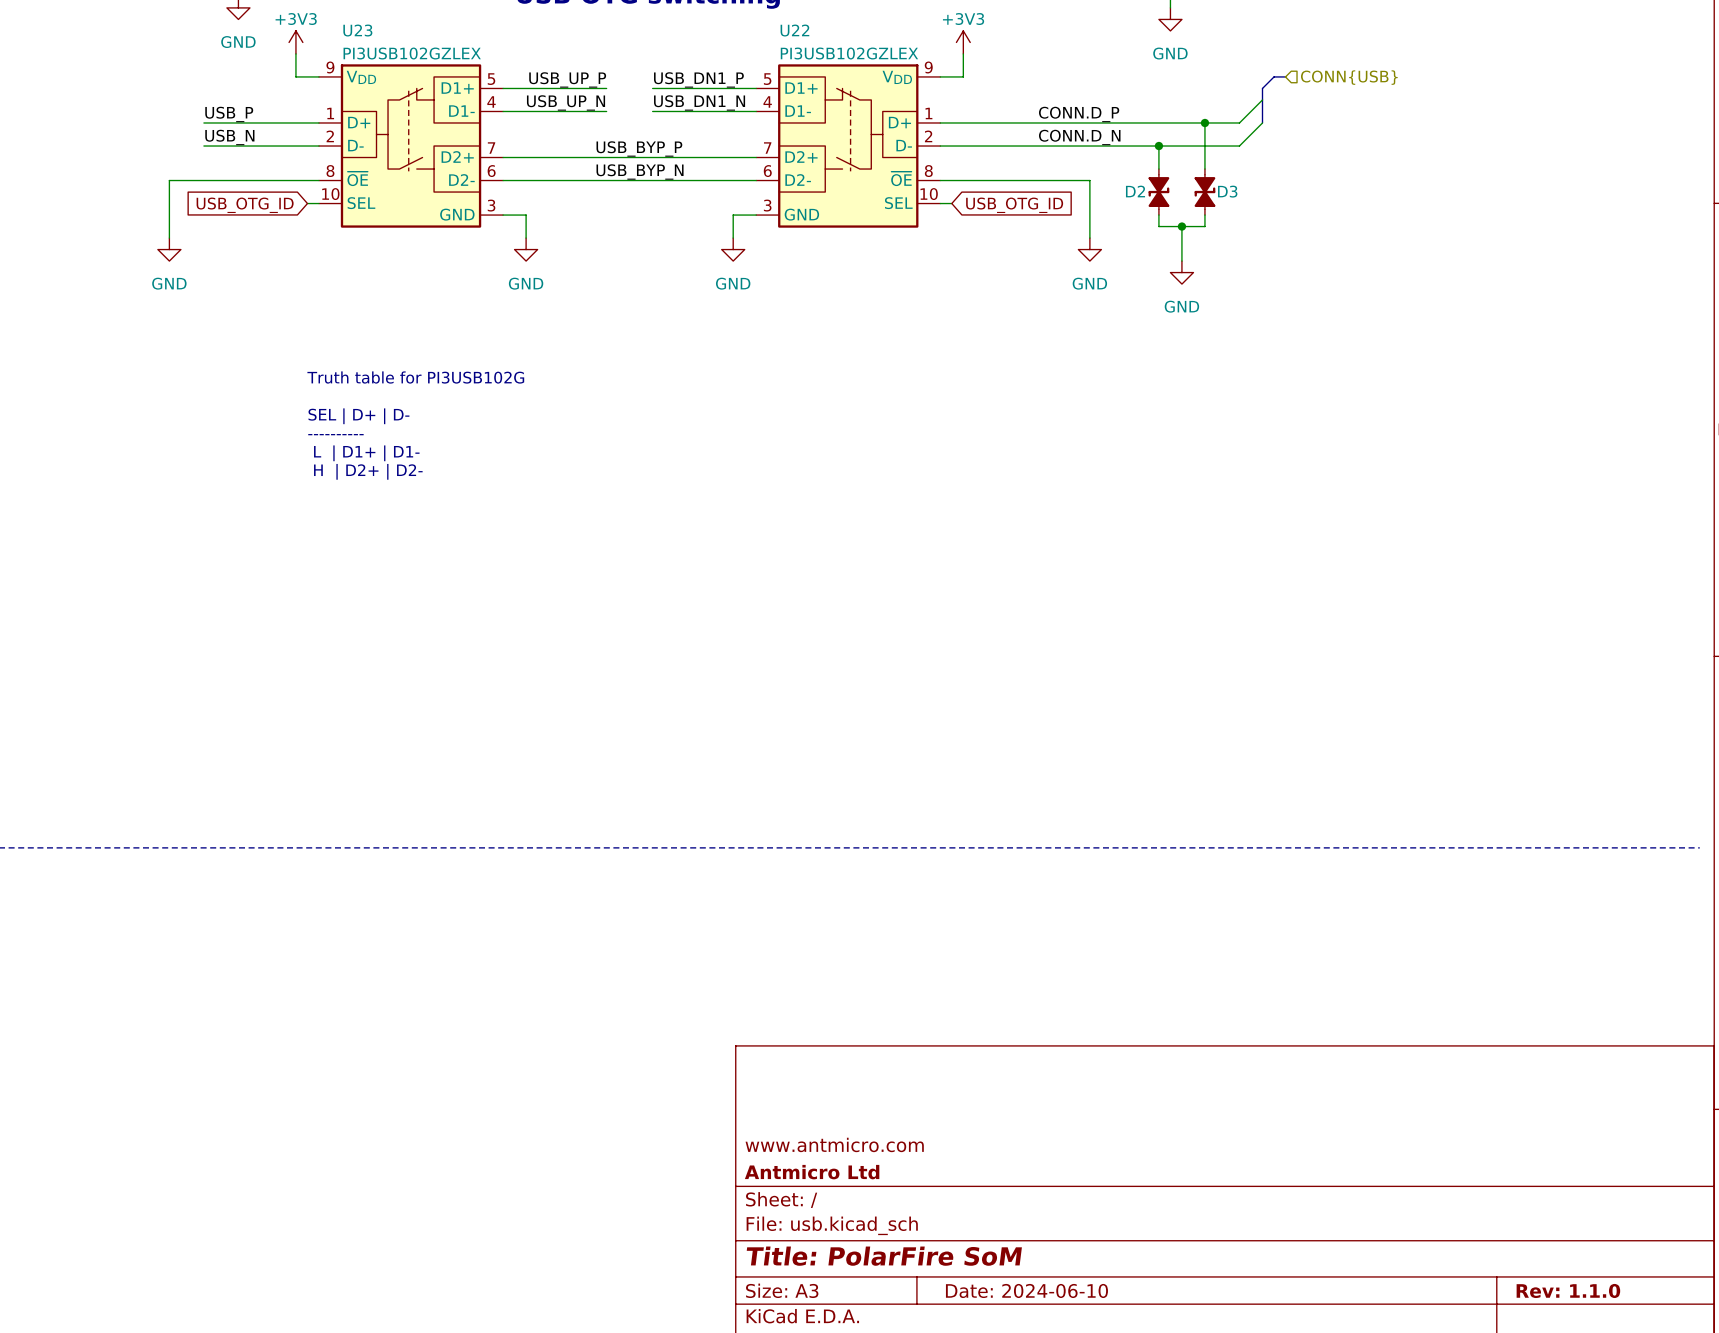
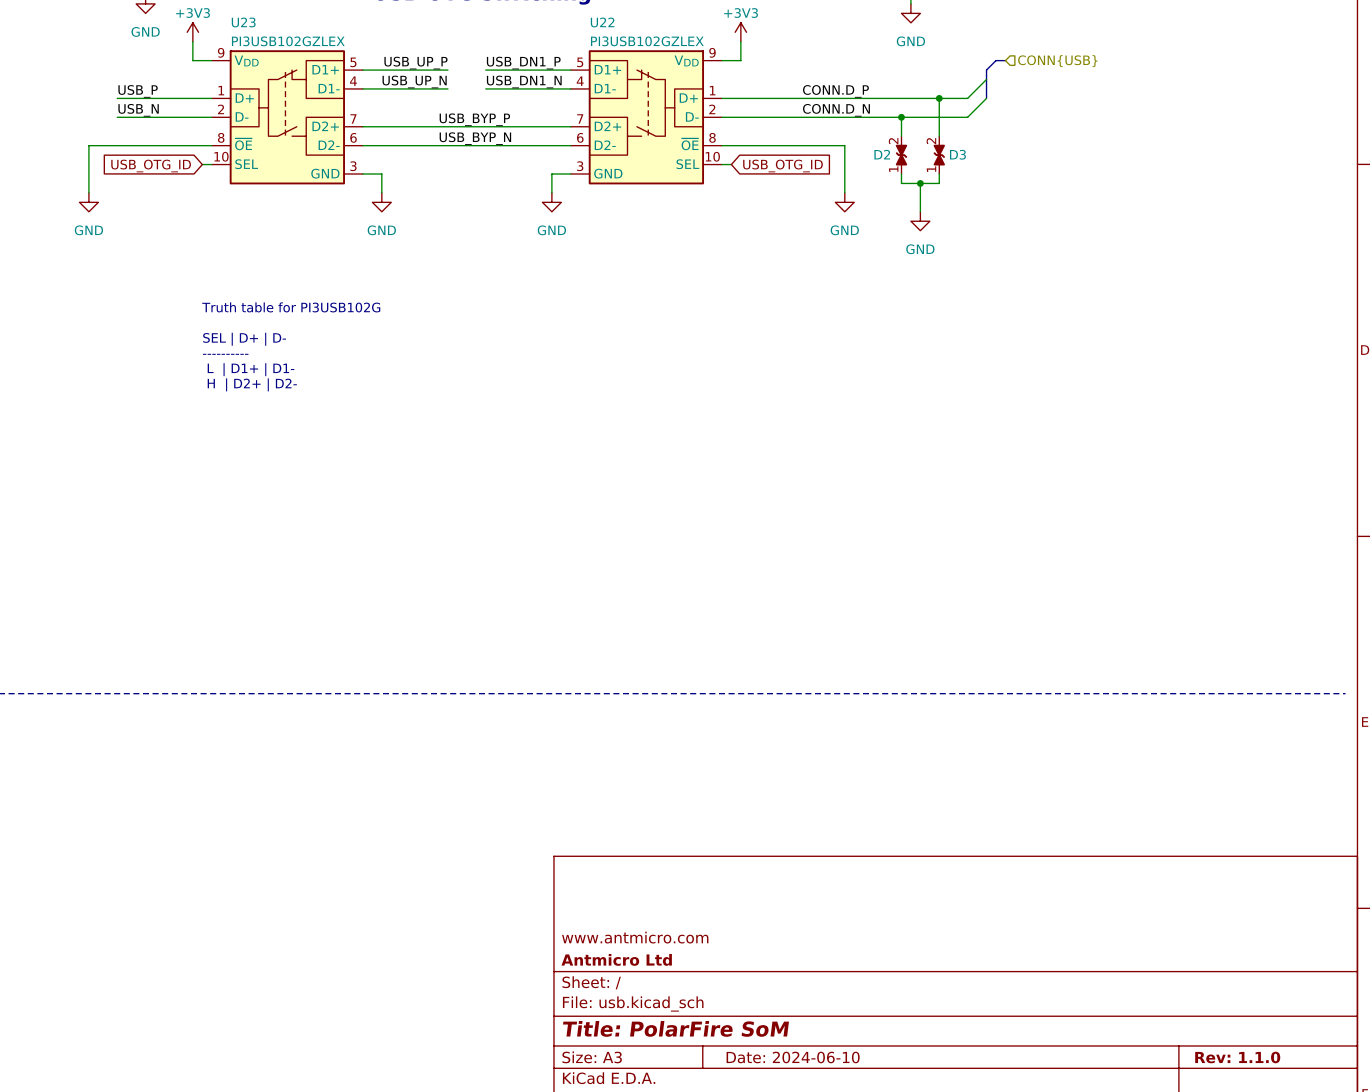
D2 symbol: [1148, 169, 1170, 216] -> [895, 136, 908, 175]
D3 symbol: [1194, 169, 1216, 216] -> [933, 136, 945, 175]

